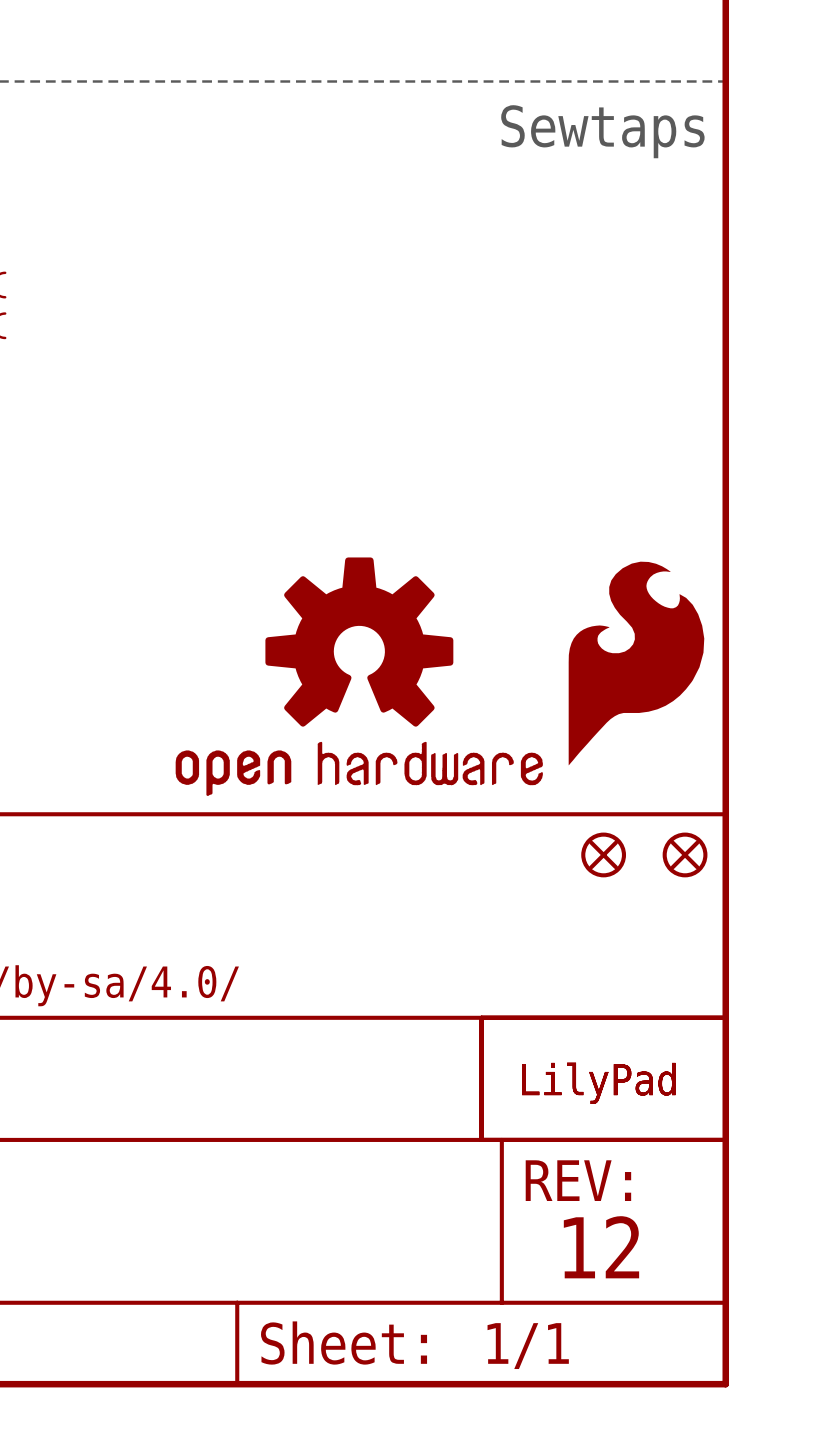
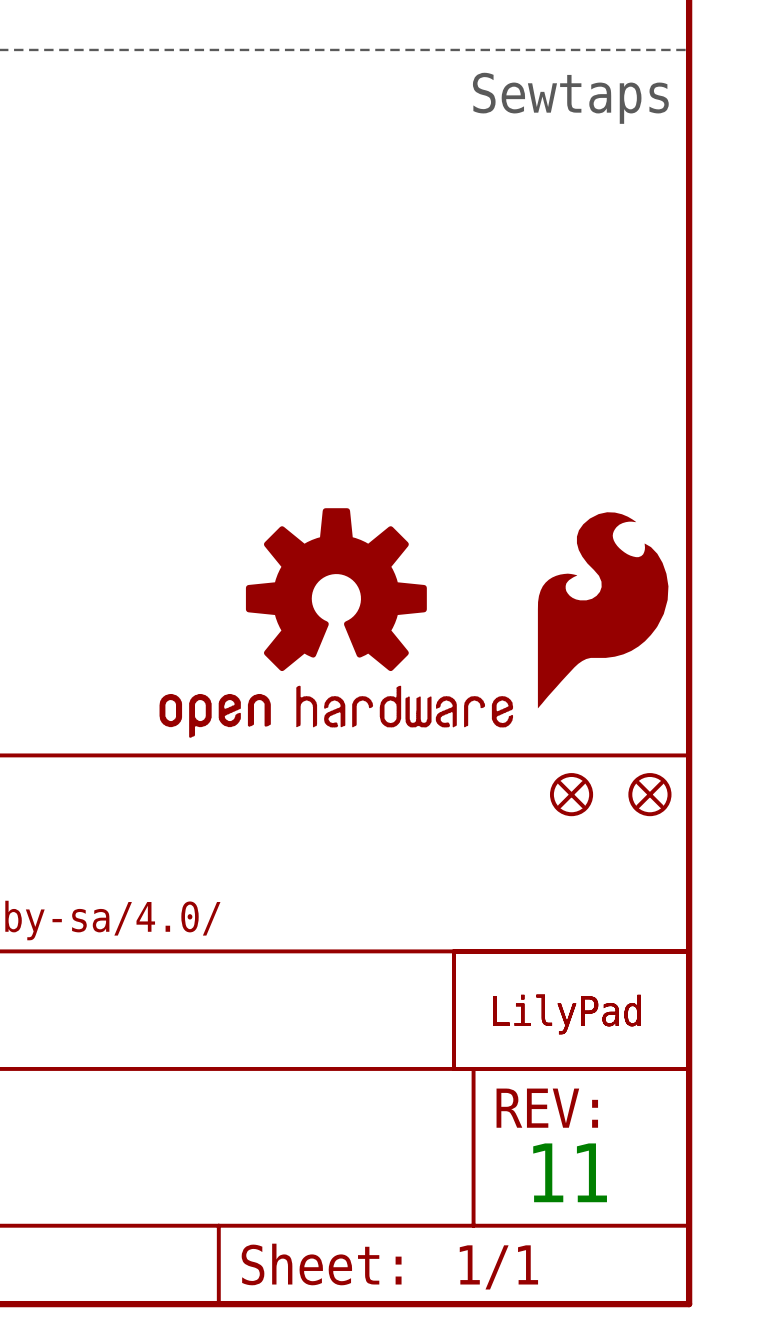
text: 12 (601, 1247) -> 11 (570, 1172)

